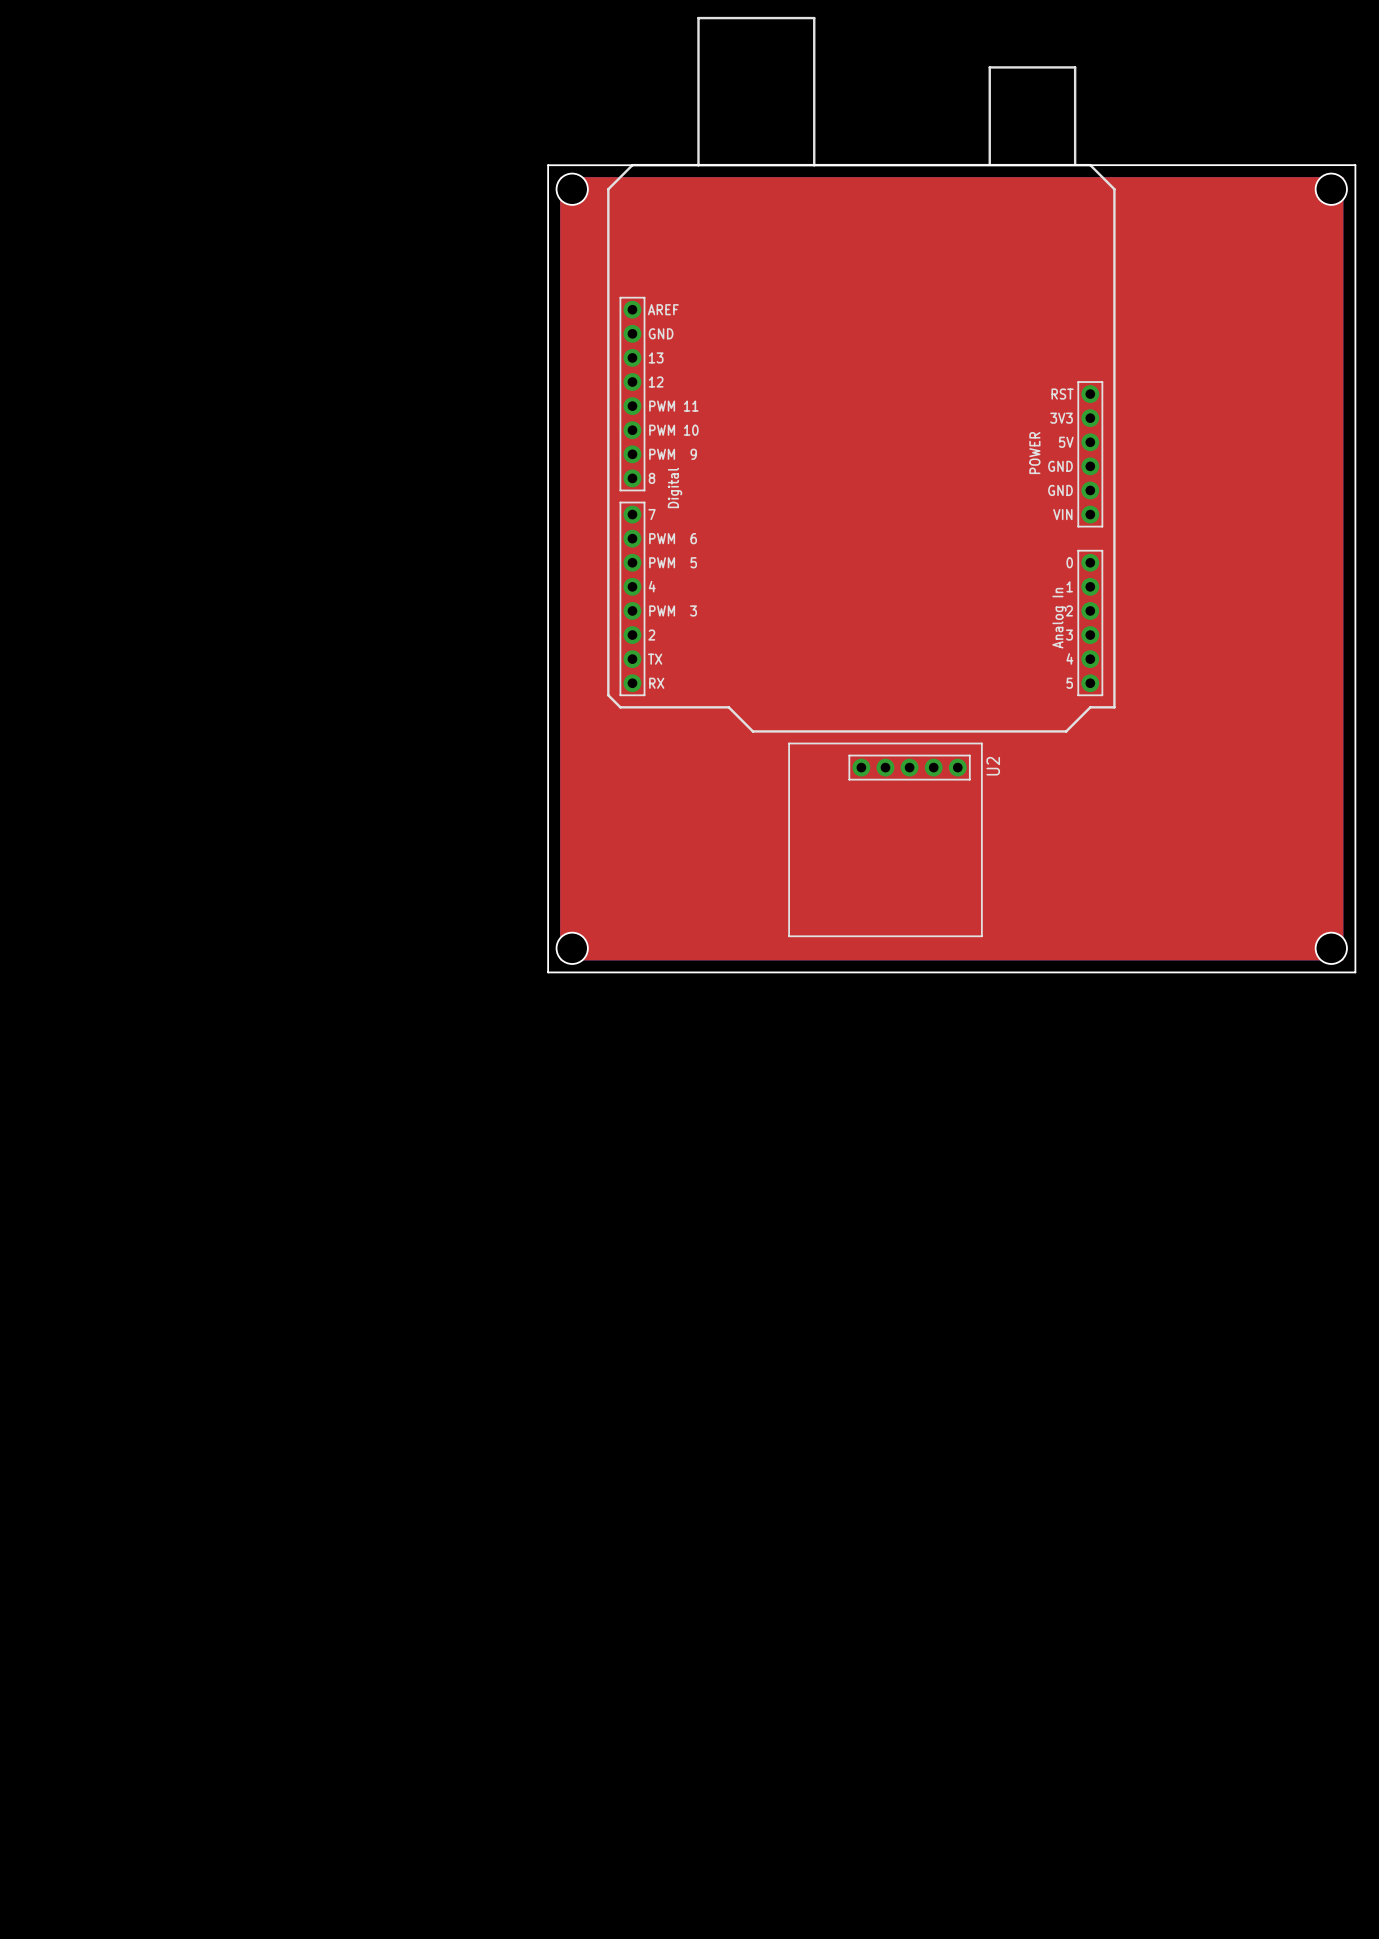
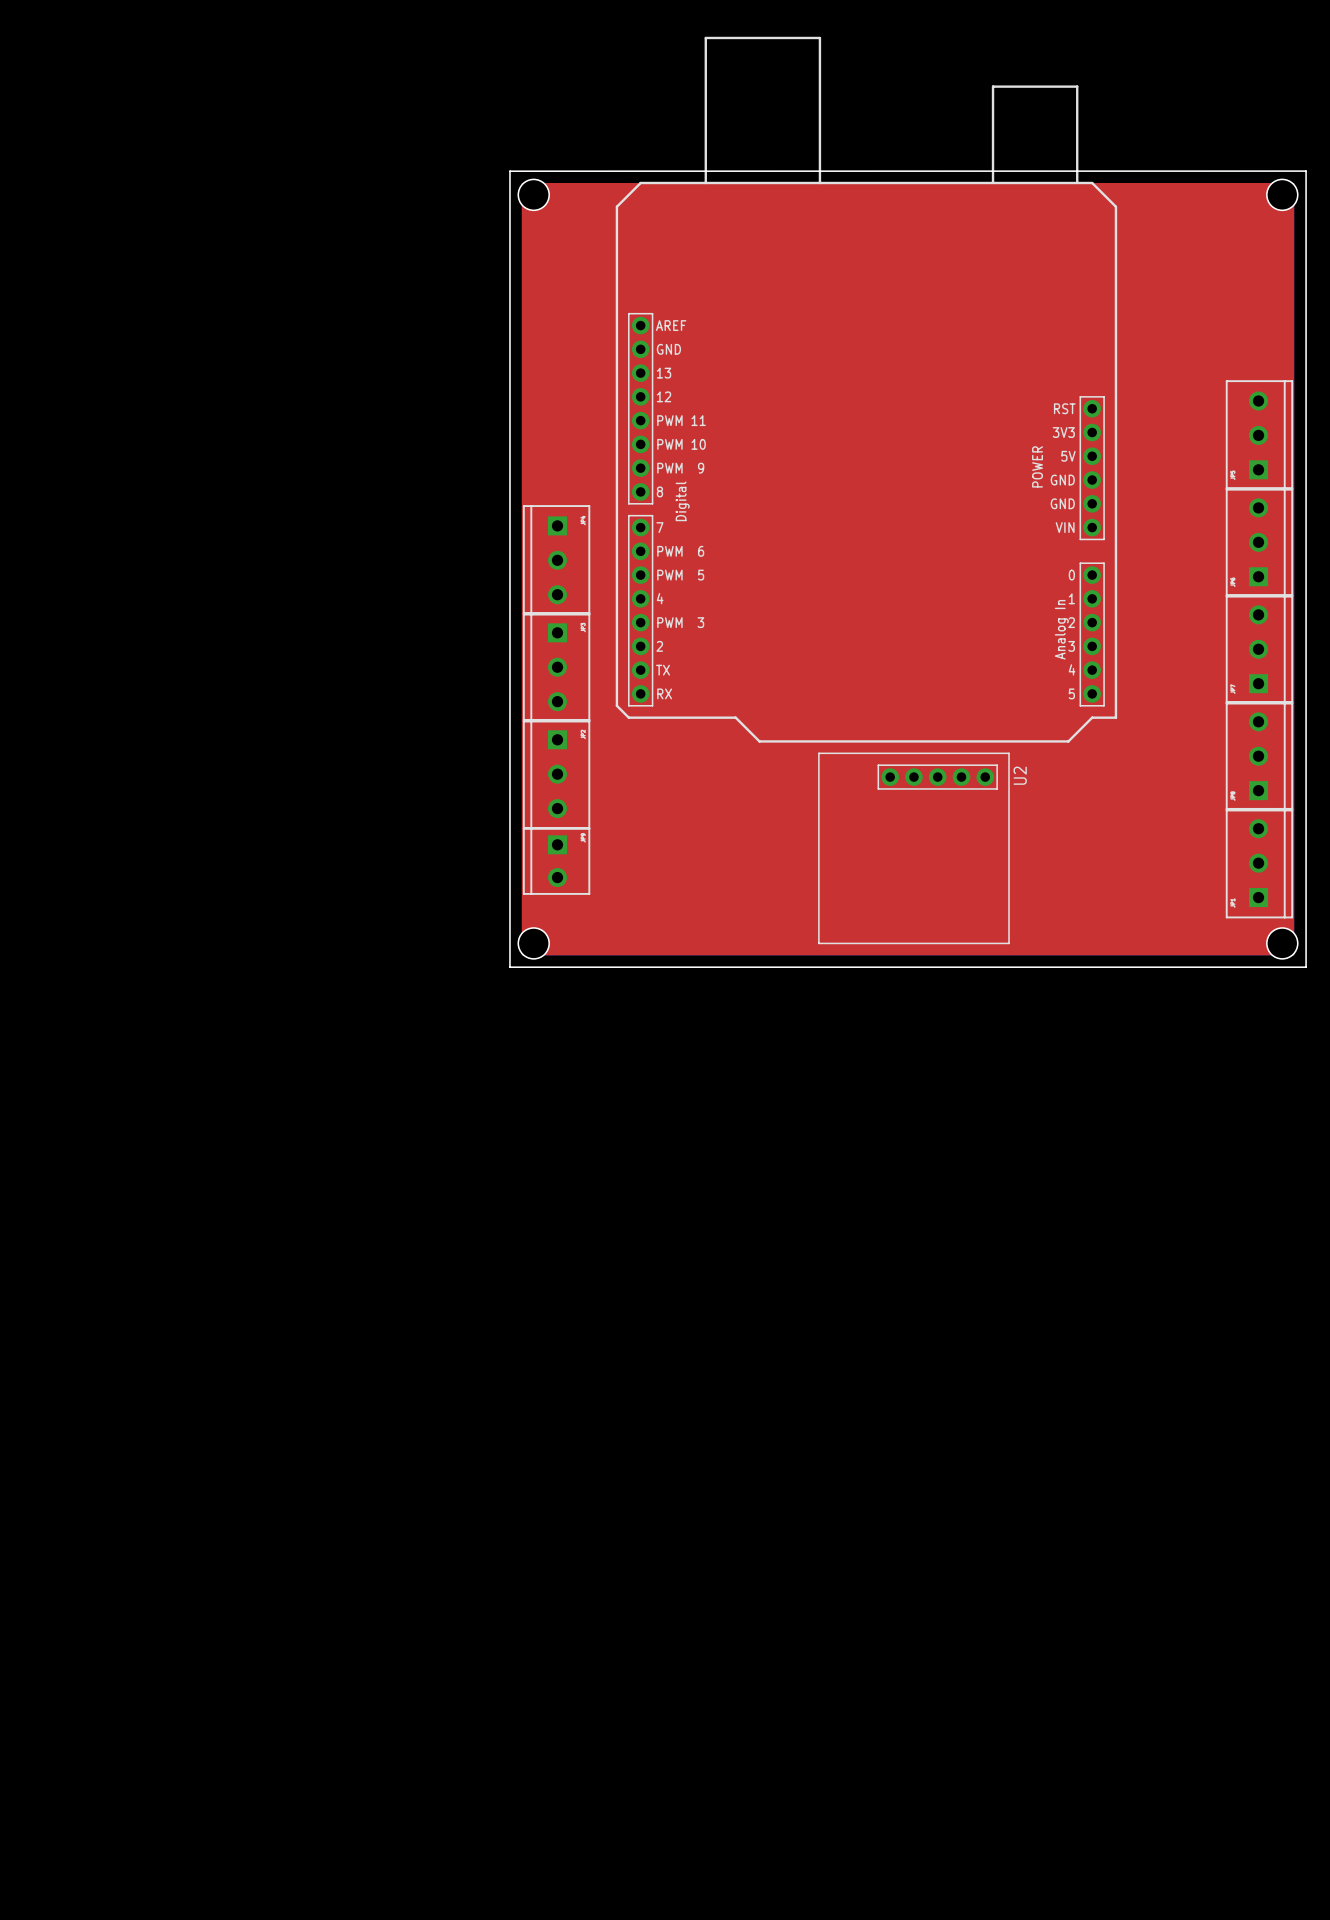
part position: (861, 374) -> (866, 389)
part: none -> (1259, 435)
part: none -> (1259, 542)
part: none -> (556, 560)
part: none -> (1259, 649)
part: none -> (556, 667)
part: none -> (1259, 756)
part: none -> (556, 774)
U2 position: (885, 839) -> (913, 848)
part: none -> (556, 861)
part: none -> (1259, 863)

